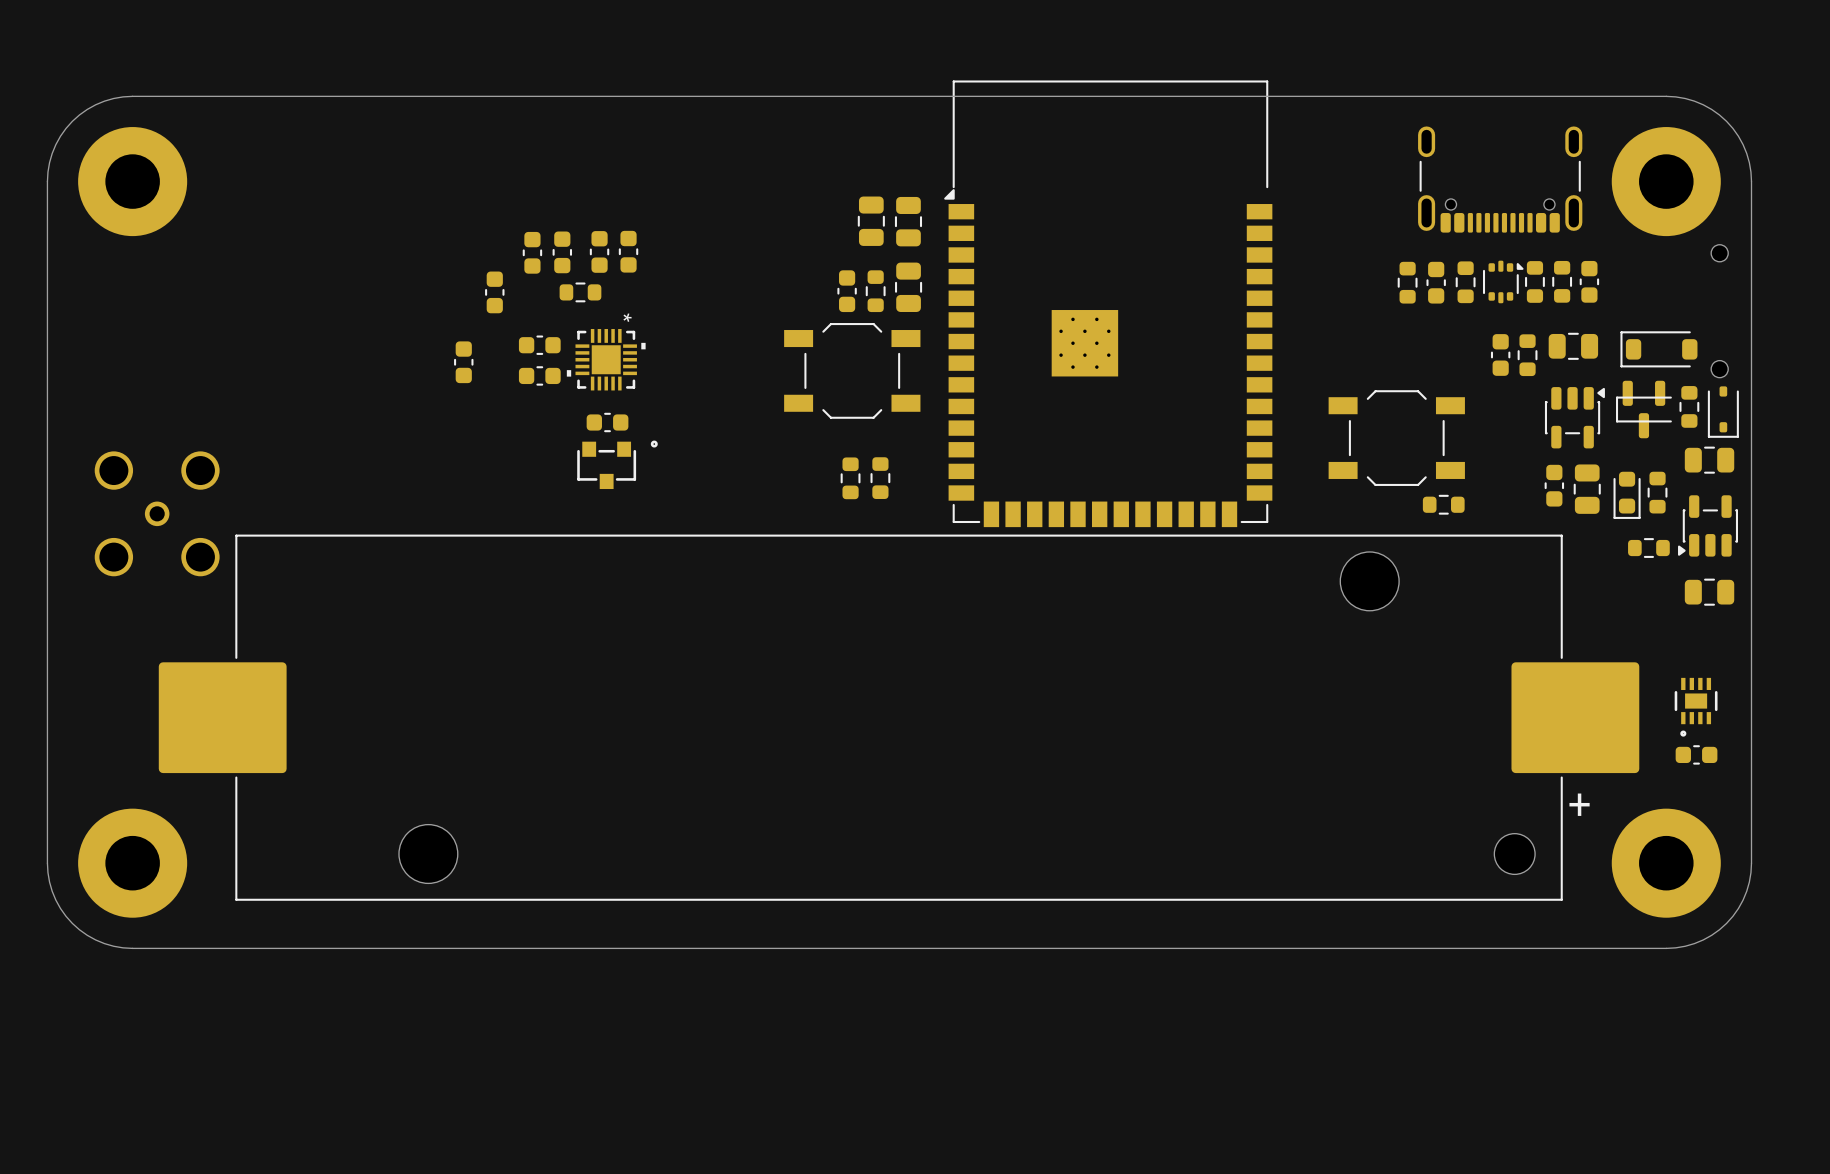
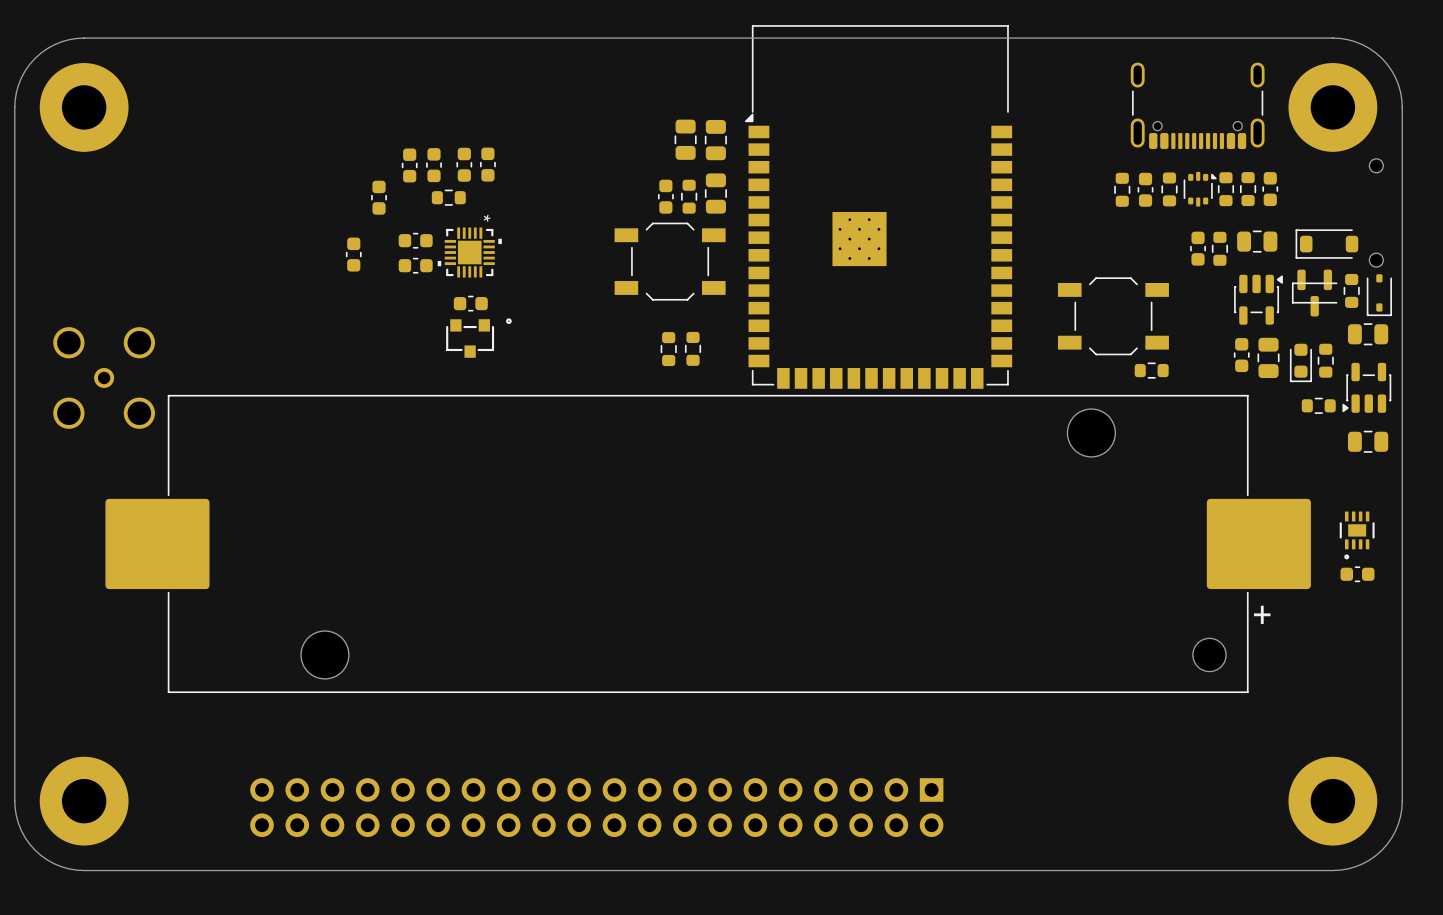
part position: (132, 863) -> (84, 801)
part position: (1666, 863) -> (1332, 801)
board edge: (1751, 863) (1746, 891) (1738, 908) (1726, 923) (1703, 939) (1685, 946) (1666, 948) (132, 948) (104, 943) (87, 935) (72, 923) (55, 900) (49, 882) (47, 863) -> (1402, 662) (1402, 801) (1398, 824) (1387, 844) (1369, 859) (1355, 866) (1332, 870) (76, 870) (54, 863) (40, 855) (25, 838) (18, 824) (14, 801) (14, 662)
part: none -> (596, 807)

